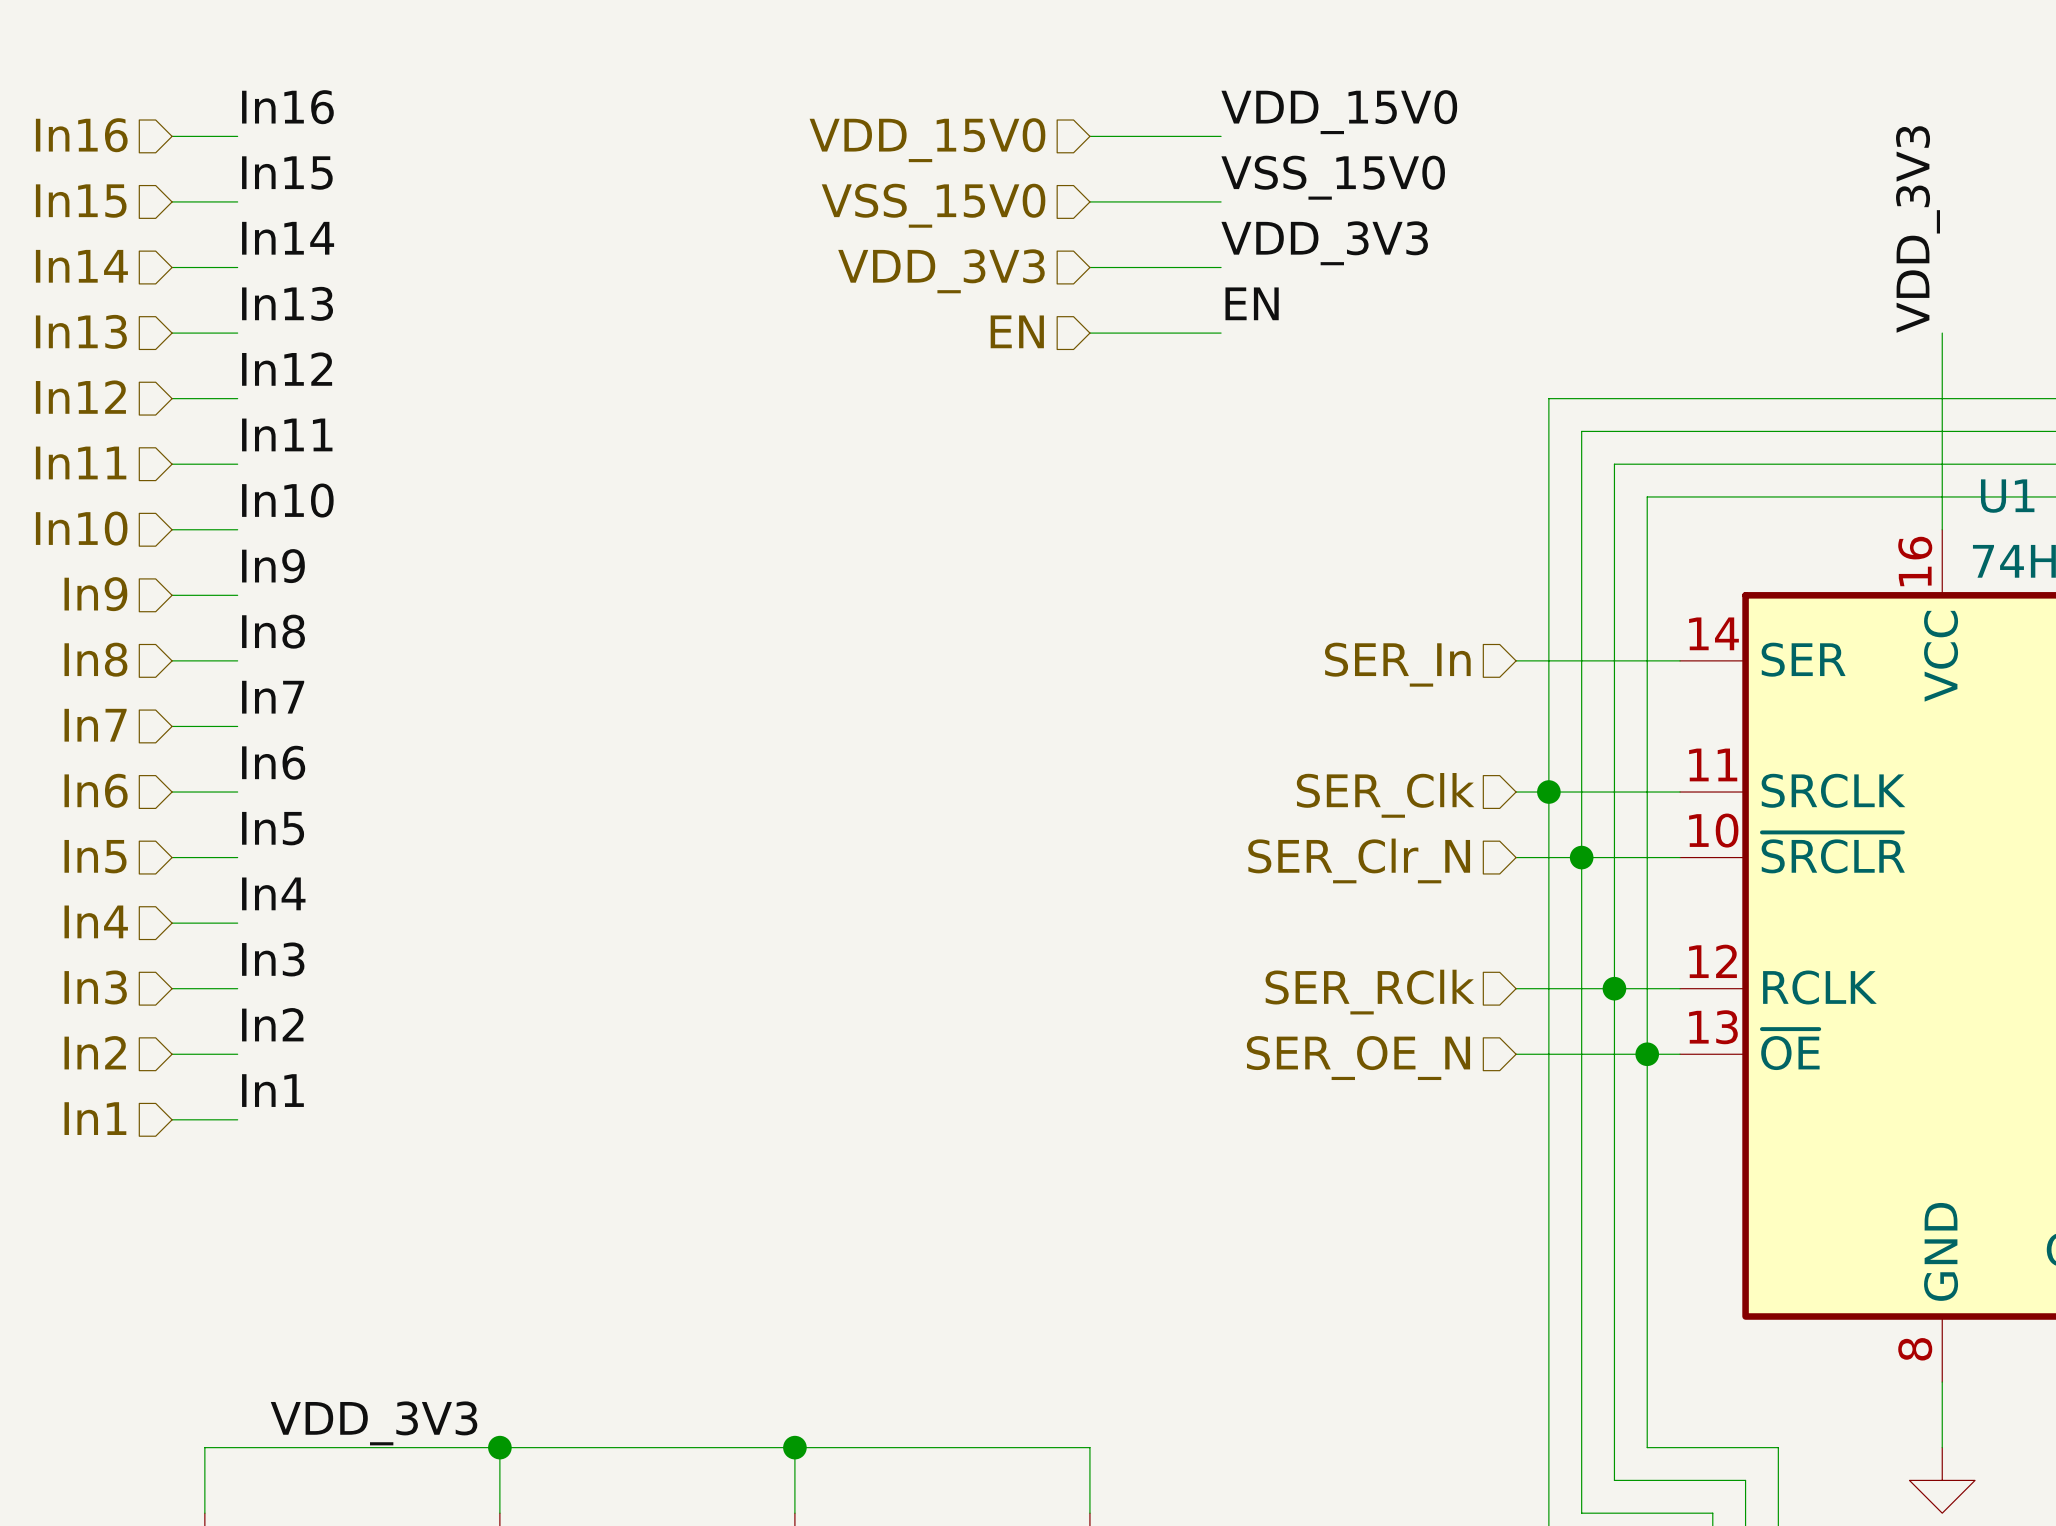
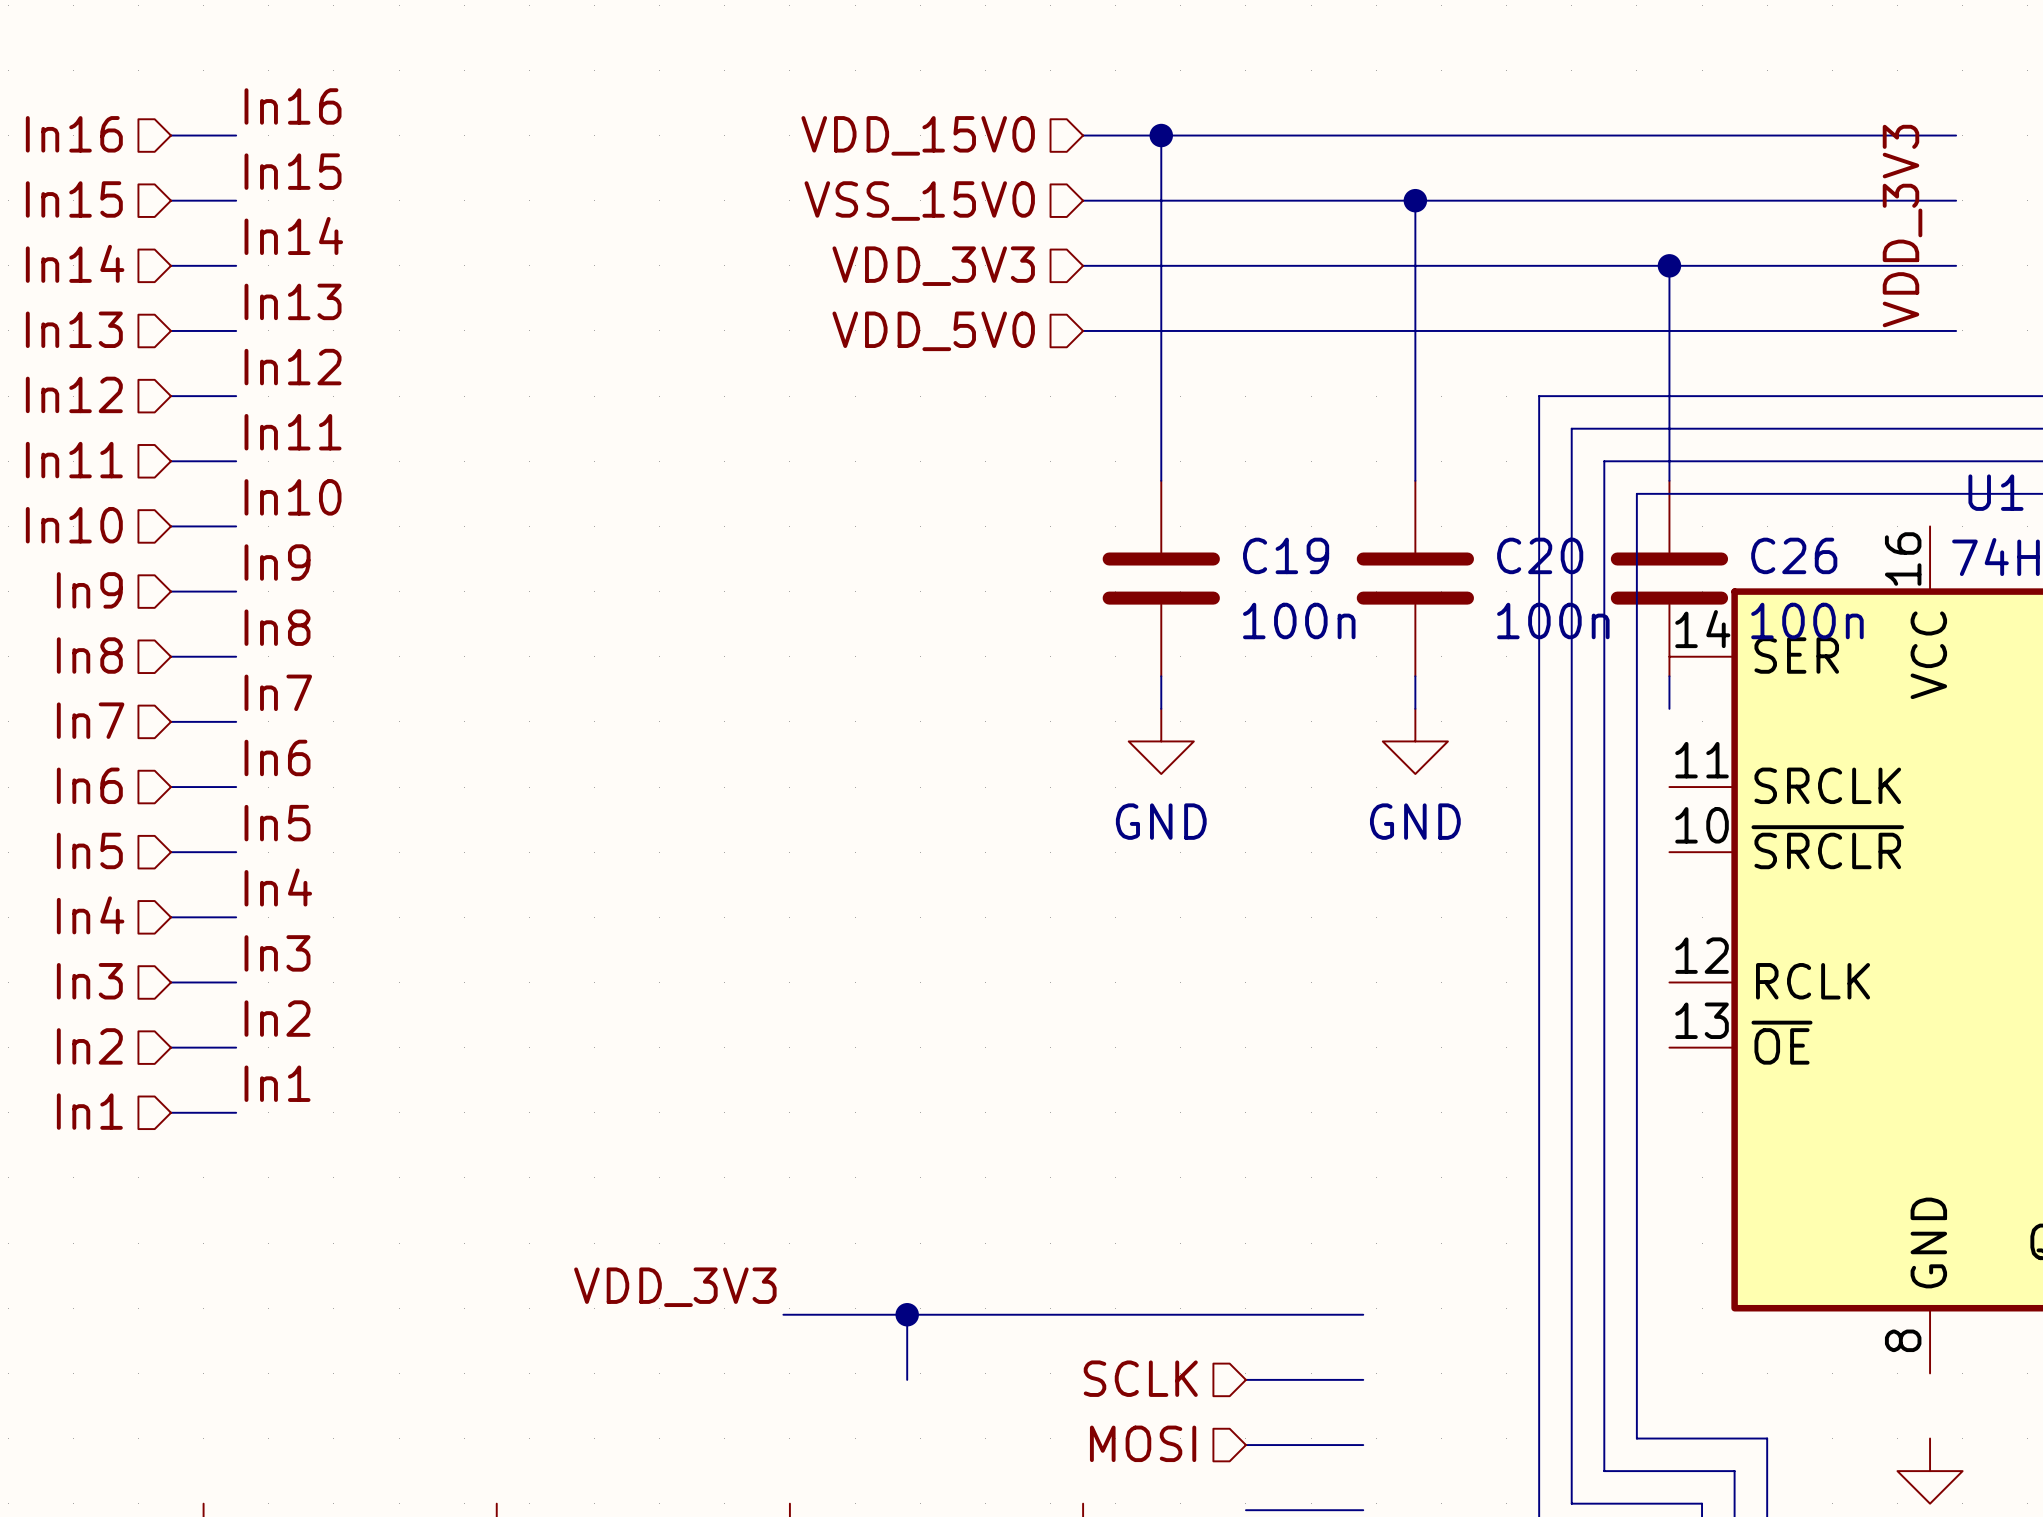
label: VDD_15V0 (1339, 112) -> none
wire: none -> (1161, 135) (1161, 480)
junction: none -> (1161, 135)
wire: none -> (1213, 135) (1956, 135)
label: VSS_15V0 (1333, 177) -> none
wire: none -> (1213, 200) (1956, 200)
wire: none -> (1415, 200) (1415, 480)
junction: none -> (1415, 200)
label: VDD_3V3 (1324, 243) -> none
wire: none -> (1213, 265) (1956, 265)
wire: none -> (1669, 265) (1669, 480)
junction: none -> (1669, 265)
label: EN (1252, 303) -> none
hierarchical label: EN (1017, 331) -> VDD_5V0 (933, 331)
wire: none -> (1213, 330) (1956, 330)
wire: (1942, 333) (1942, 529) -> none
C19: none -> 100n (1161, 578)
C20: none -> 100n (1415, 578)
C26: none -> 100n (1669, 578)
wire: (1516, 660) (1680, 660) -> none
hierarchical label: SER_In (1397, 664) -> none
wire: none -> (1161, 676) (1161, 708)
wire: none -> (1415, 676) (1415, 708)
wire: none -> (1669, 676) (1669, 708)
power symbol: none -> GND (1161, 741)
power symbol: none -> GND (1415, 741)
wire: (1516, 792) (1680, 792) -> none
junction: (1548, 792) -> none
hierarchical label: SER_Clk (1385, 795) -> none
wire: (1516, 857) (1680, 857) -> none
junction: (1581, 857) -> none
hierarchical label: SER_Clr_N (1359, 860) -> none
wire: (1516, 988) (1680, 988) -> none
junction: (1614, 988) -> none
hierarchical label: SER_RClk (1369, 992) -> none
wire: (1516, 1054) (1680, 1054) -> none
junction: (1647, 1054) -> none
hierarchical label: SER_OE_N (1358, 1058) -> none
label: none -> VDD_3V3 (675, 1287)
wire: none -> (783, 1314) (1363, 1314)
junction: none -> (907, 1314)
wire: (1942, 1382) (1942, 1447) -> none
hierarchical label: none -> SCLK (1140, 1378)
wire: none -> (1245, 1379) (1363, 1379)
label: VDD_3V3 (374, 1423) -> none
wire: (499, 1447) (499, 1513) -> none
junction: (499, 1447) -> none
wire: (794, 1447) (794, 1513) -> (907, 1314) (907, 1379)
junction: (794, 1447) -> none
hierarchical label: none -> MOSI (1143, 1443)
wire: none -> (1245, 1445) (1363, 1445)
wire: (204, 1513) (204, 1447) (1089, 1447) (1089, 1513) -> none
wire: none -> (1245, 1510) (1363, 1510)

